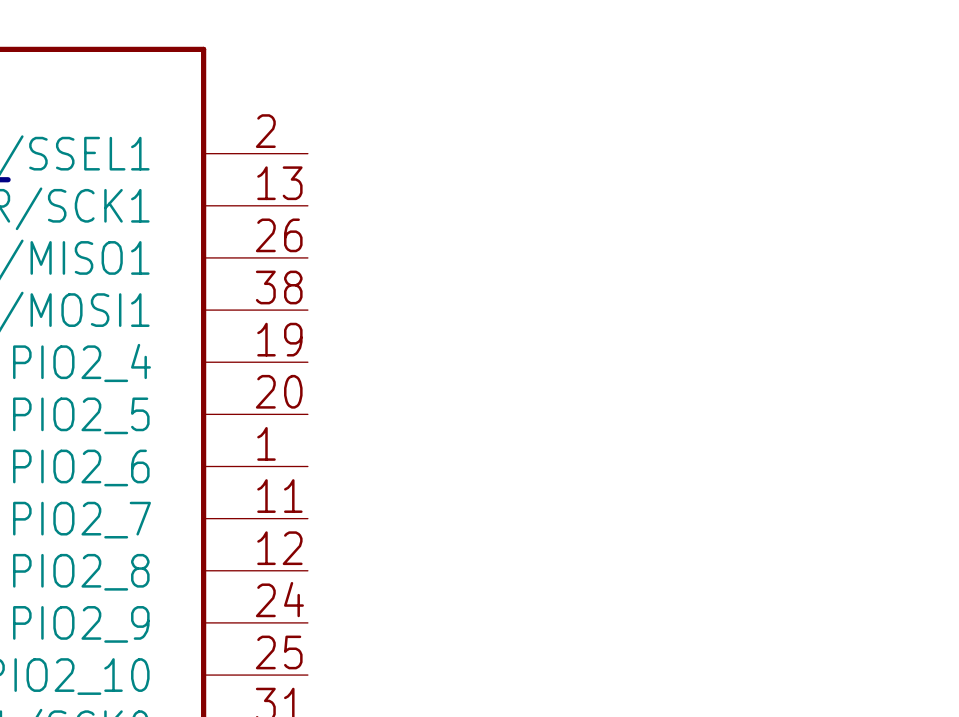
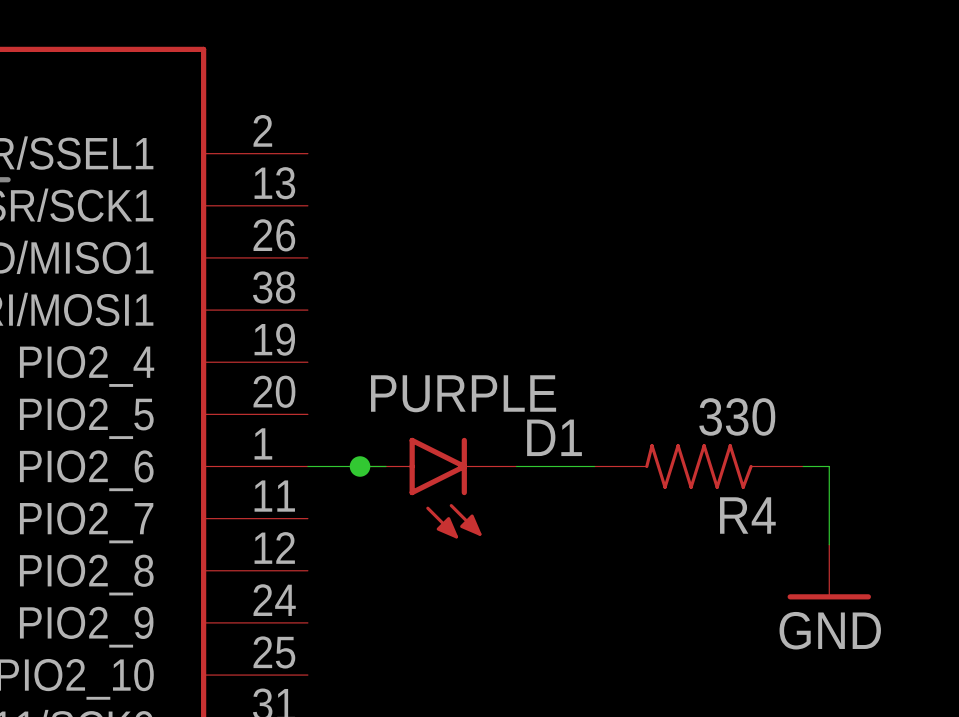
wire: none -> (307, 466) (386, 466)
junction: none -> (360, 466)
wire: none -> (516, 466) (594, 466)
R4: none -> 330 (698, 466)
wire: none -> (803, 466) (829, 466) (829, 544)
D1: none -> PURPLE (438, 488)
power symbol: none -> GND (829, 572)

